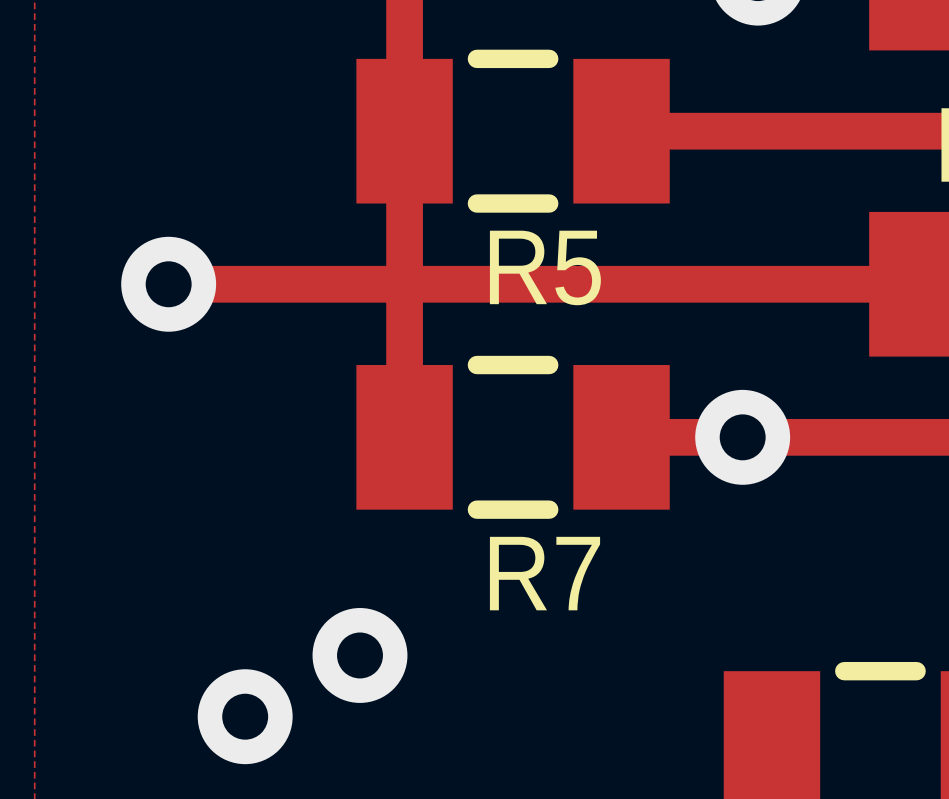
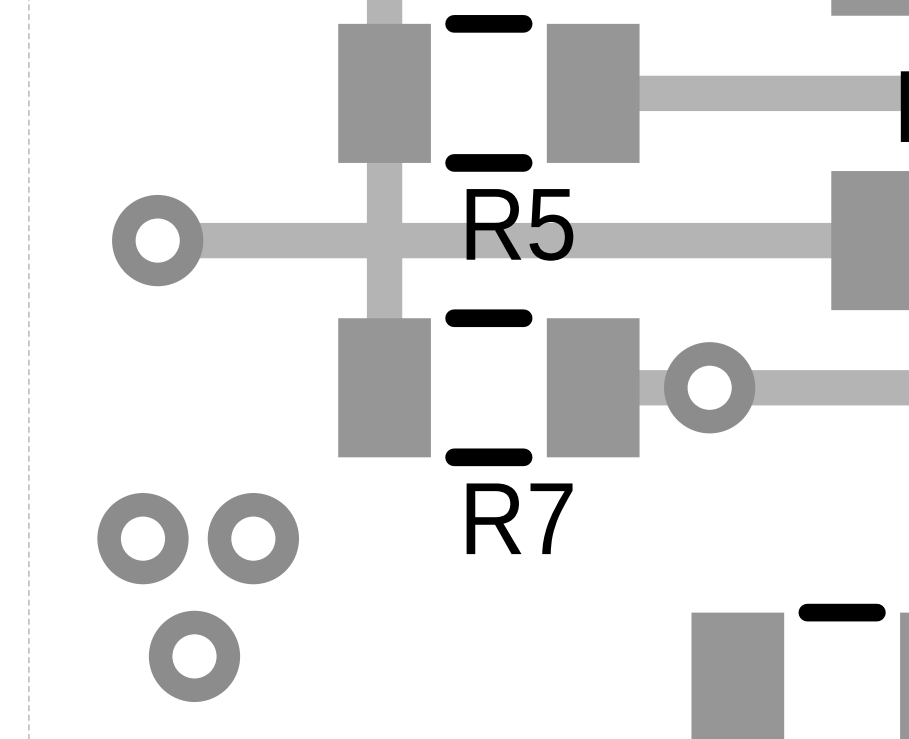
via: none -> (142, 538)
via position: (359, 655) -> (253, 538)
via position: (245, 716) -> (194, 656)

